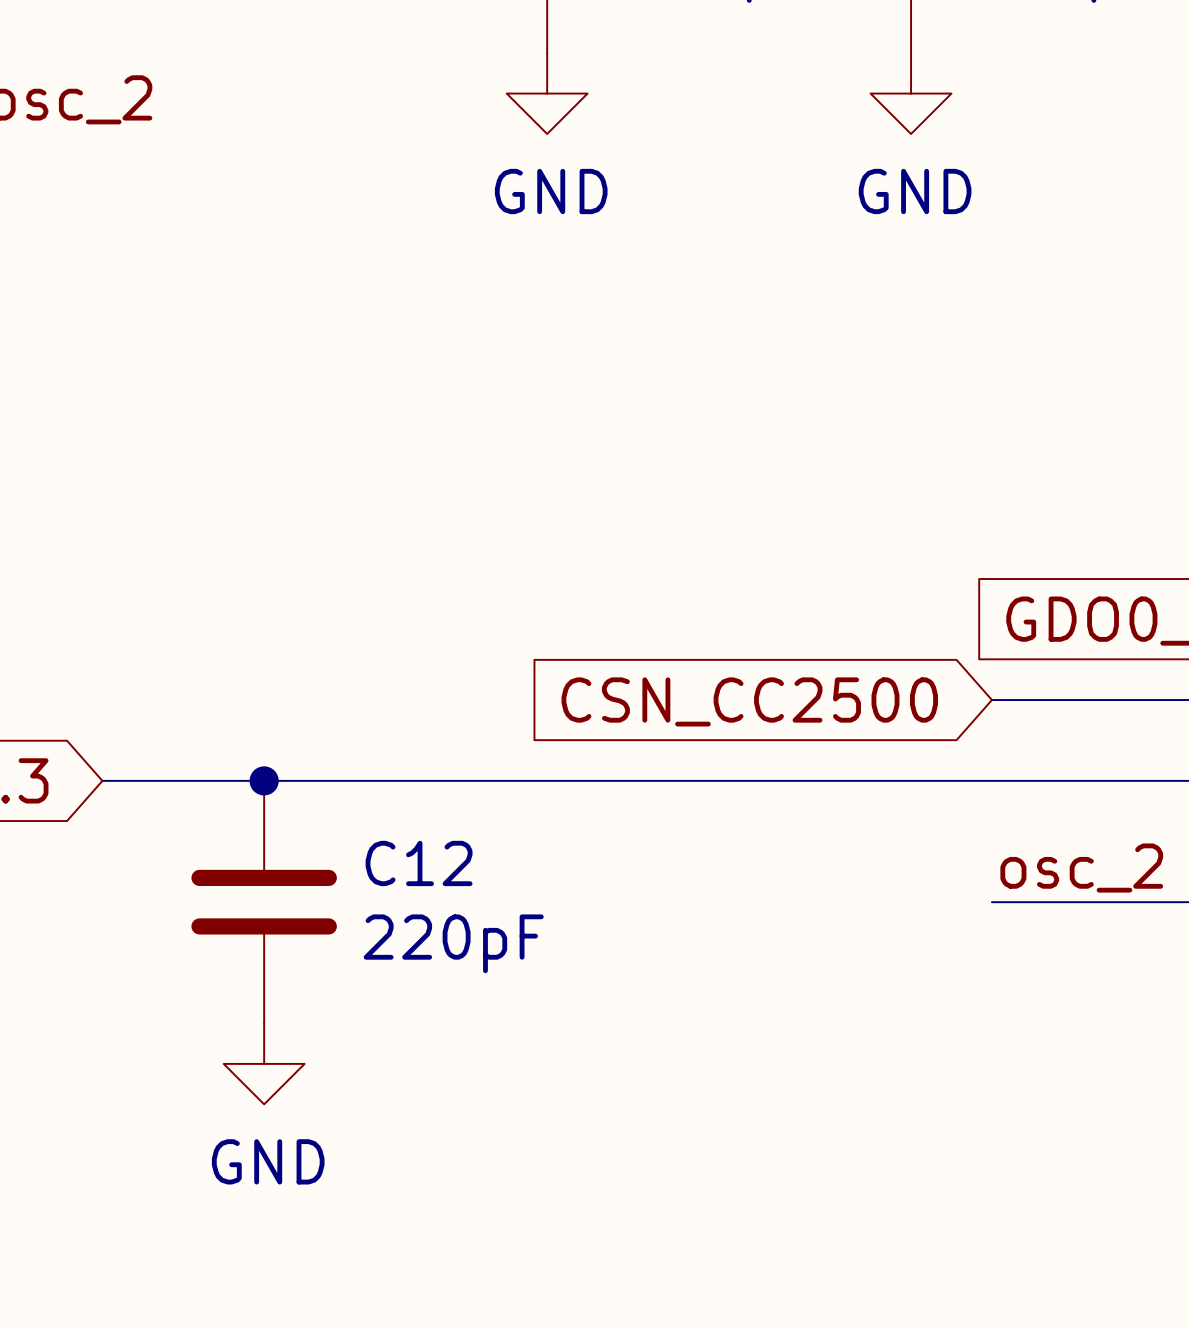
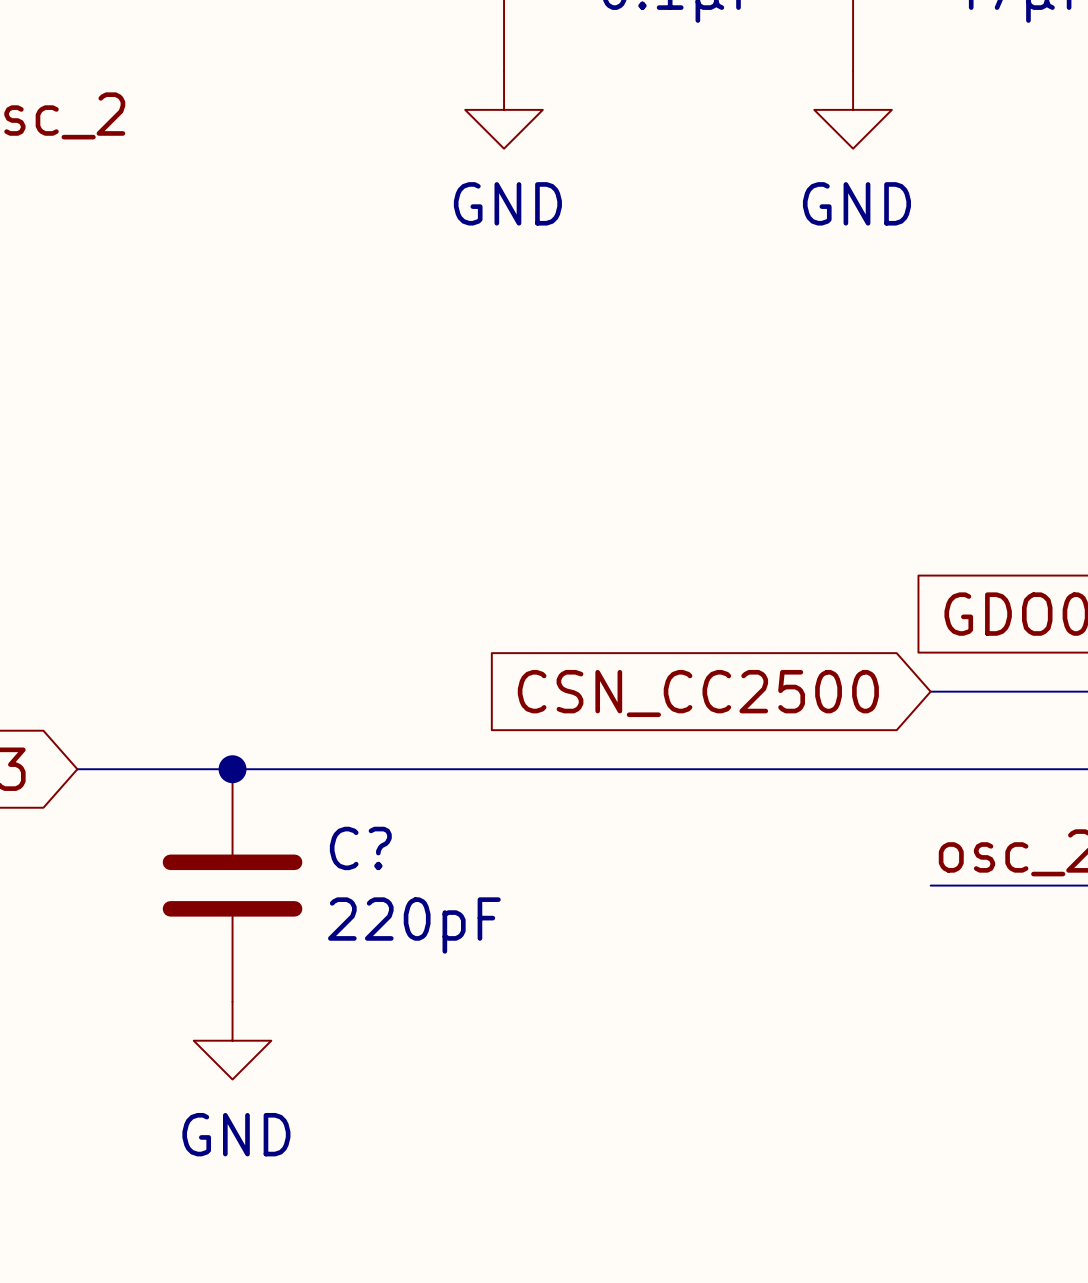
C12 name: C12 (419, 863) -> C? (360, 848)

